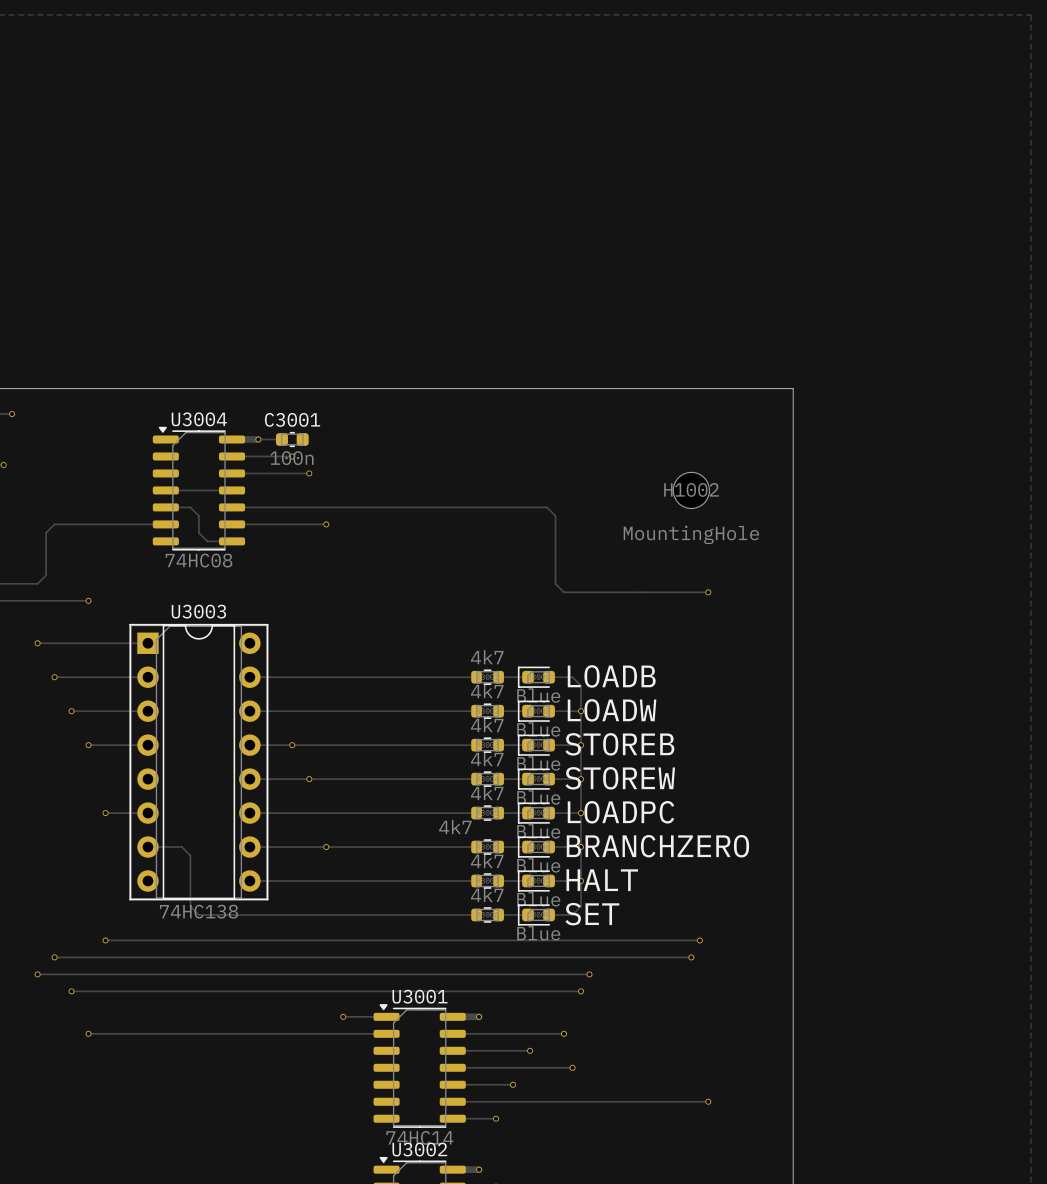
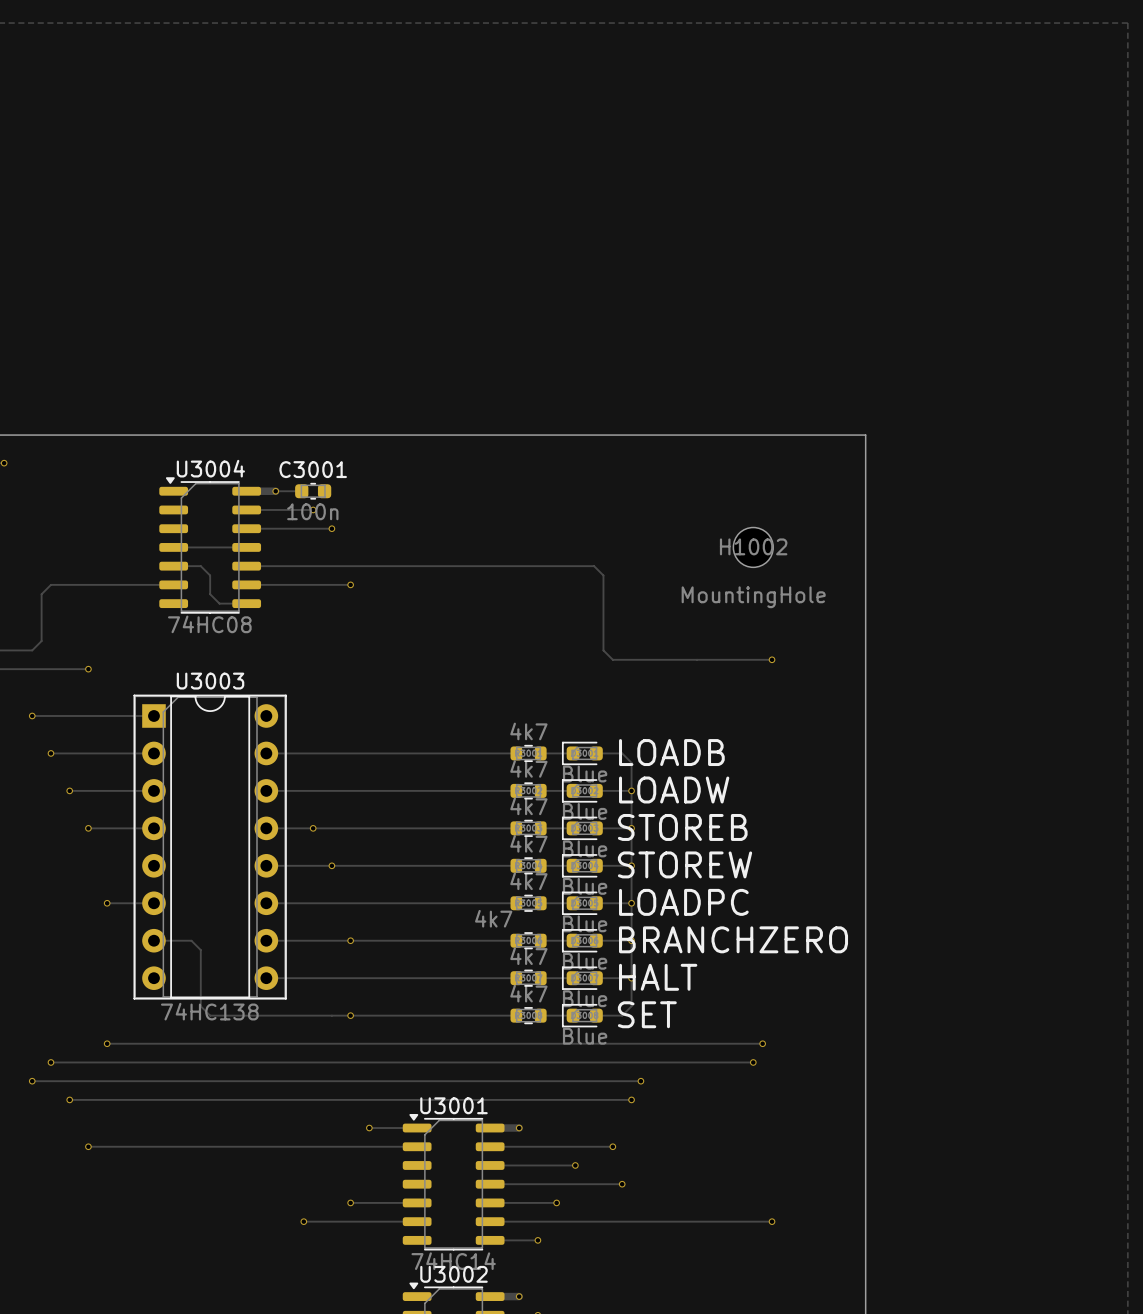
via: none -> (350, 1015)
track: none -> (350, 1202) (417, 1202)
via: none -> (350, 1202)
track: none -> (303, 1221) (417, 1221)
via: none -> (303, 1221)

